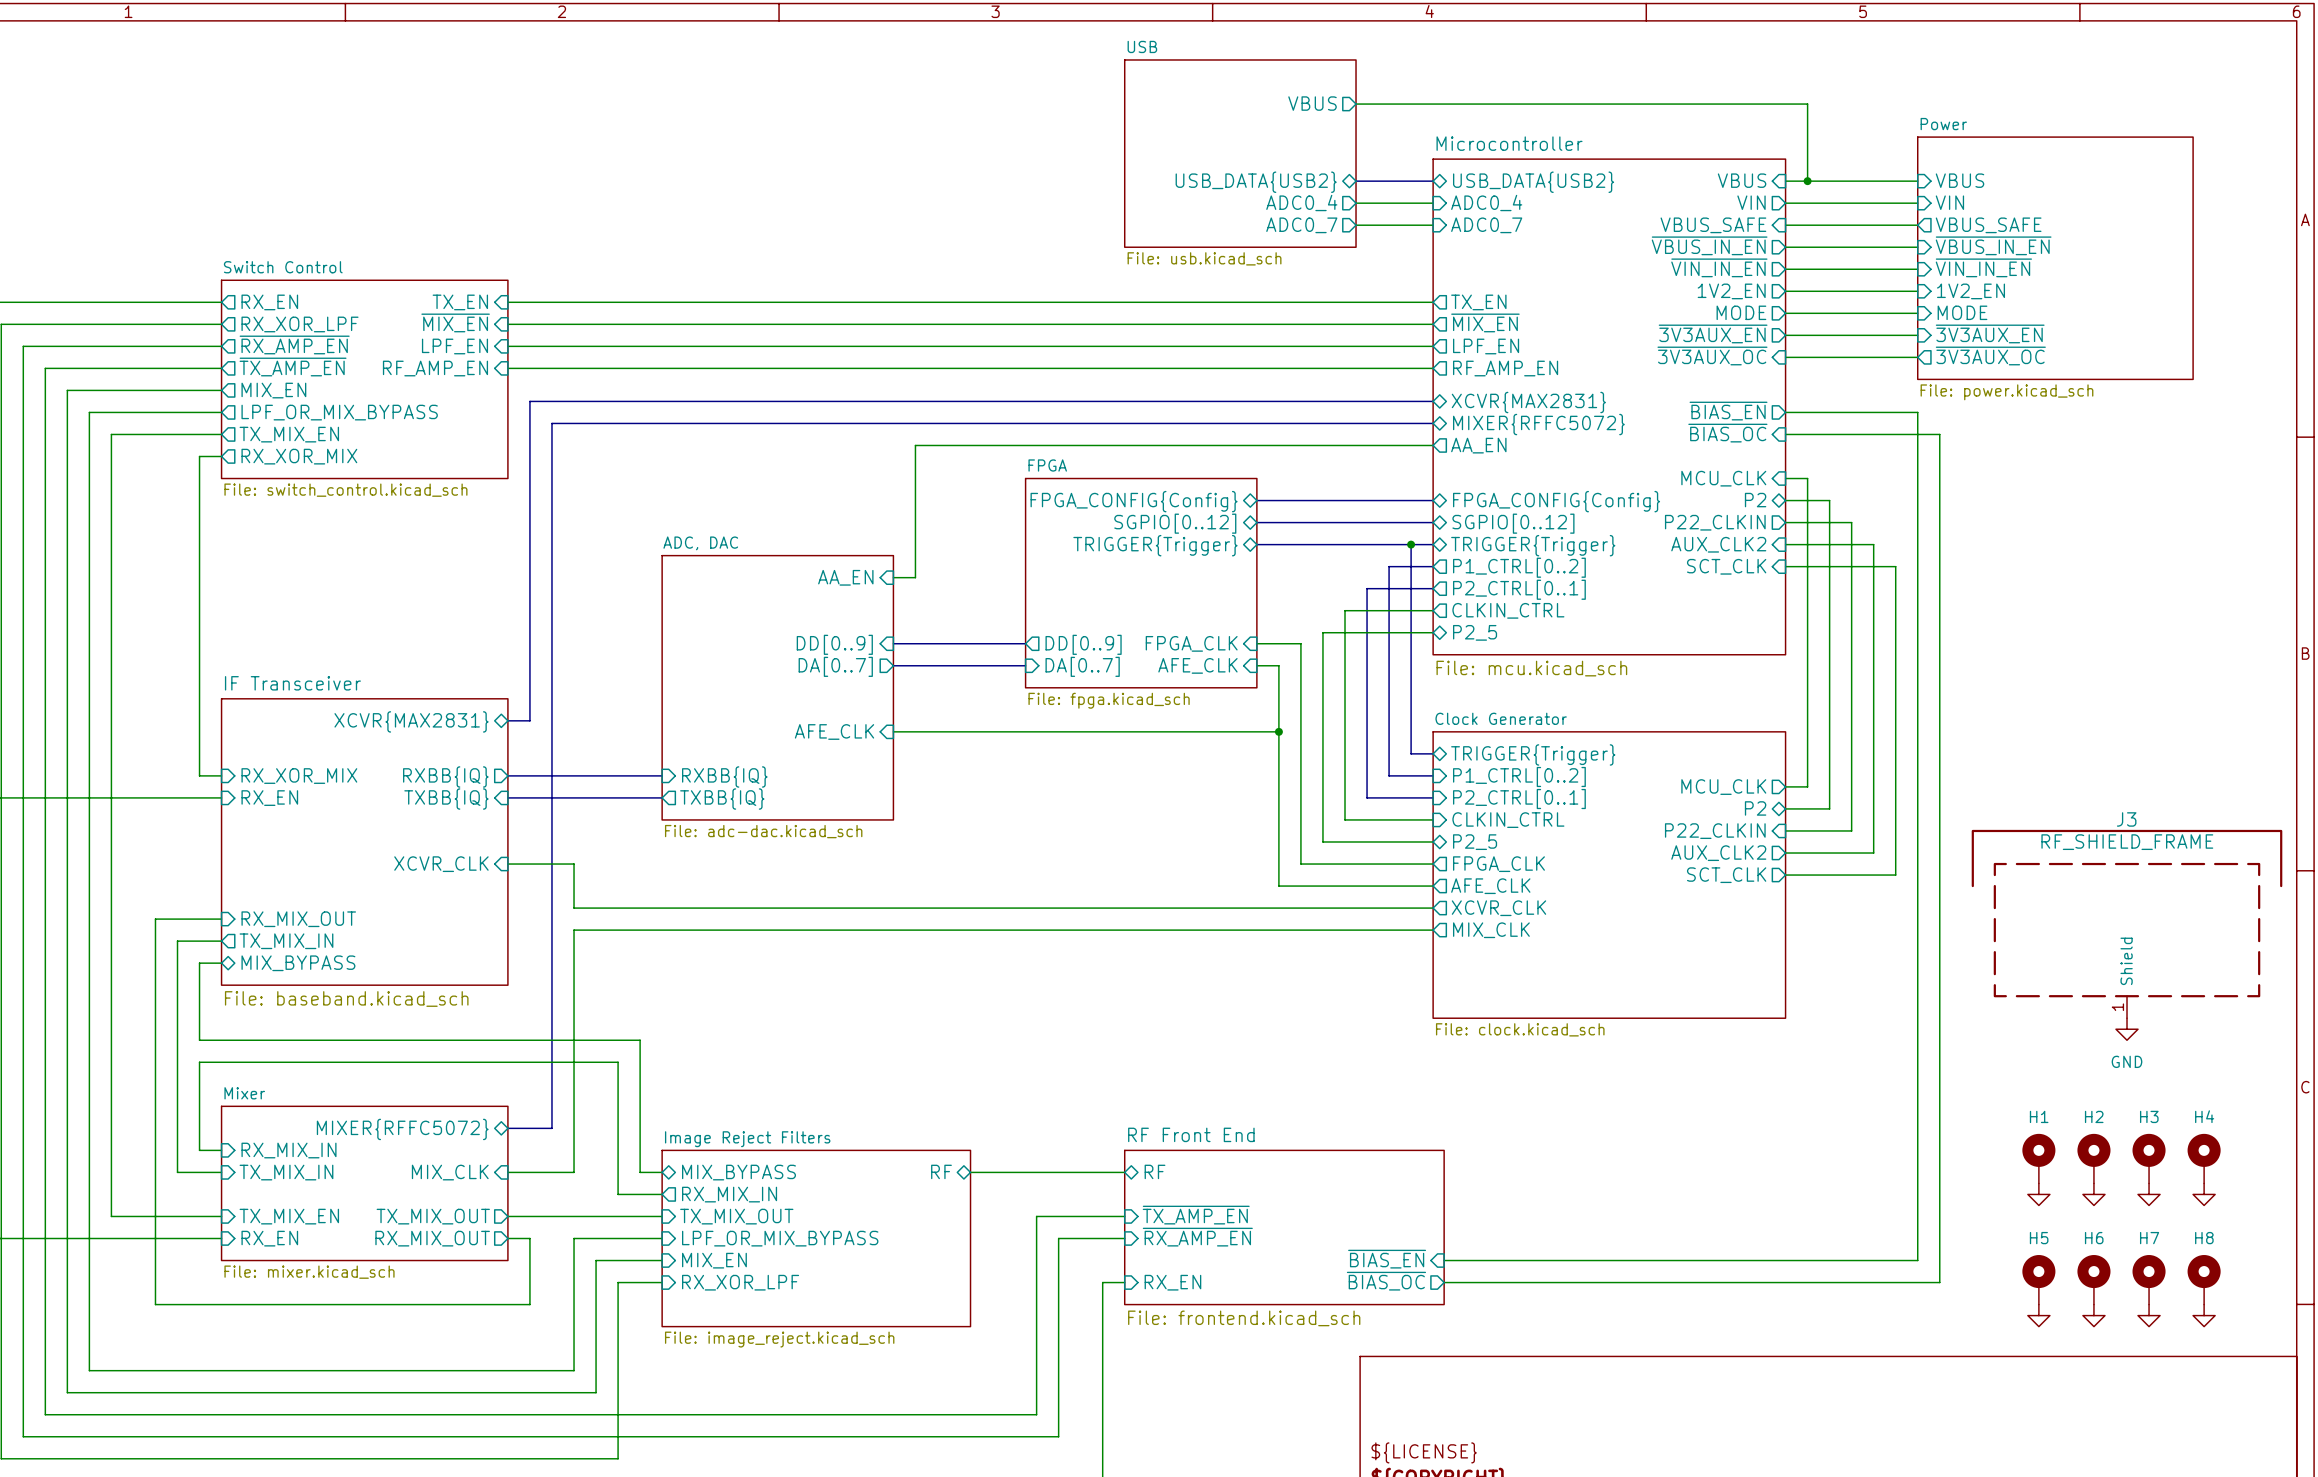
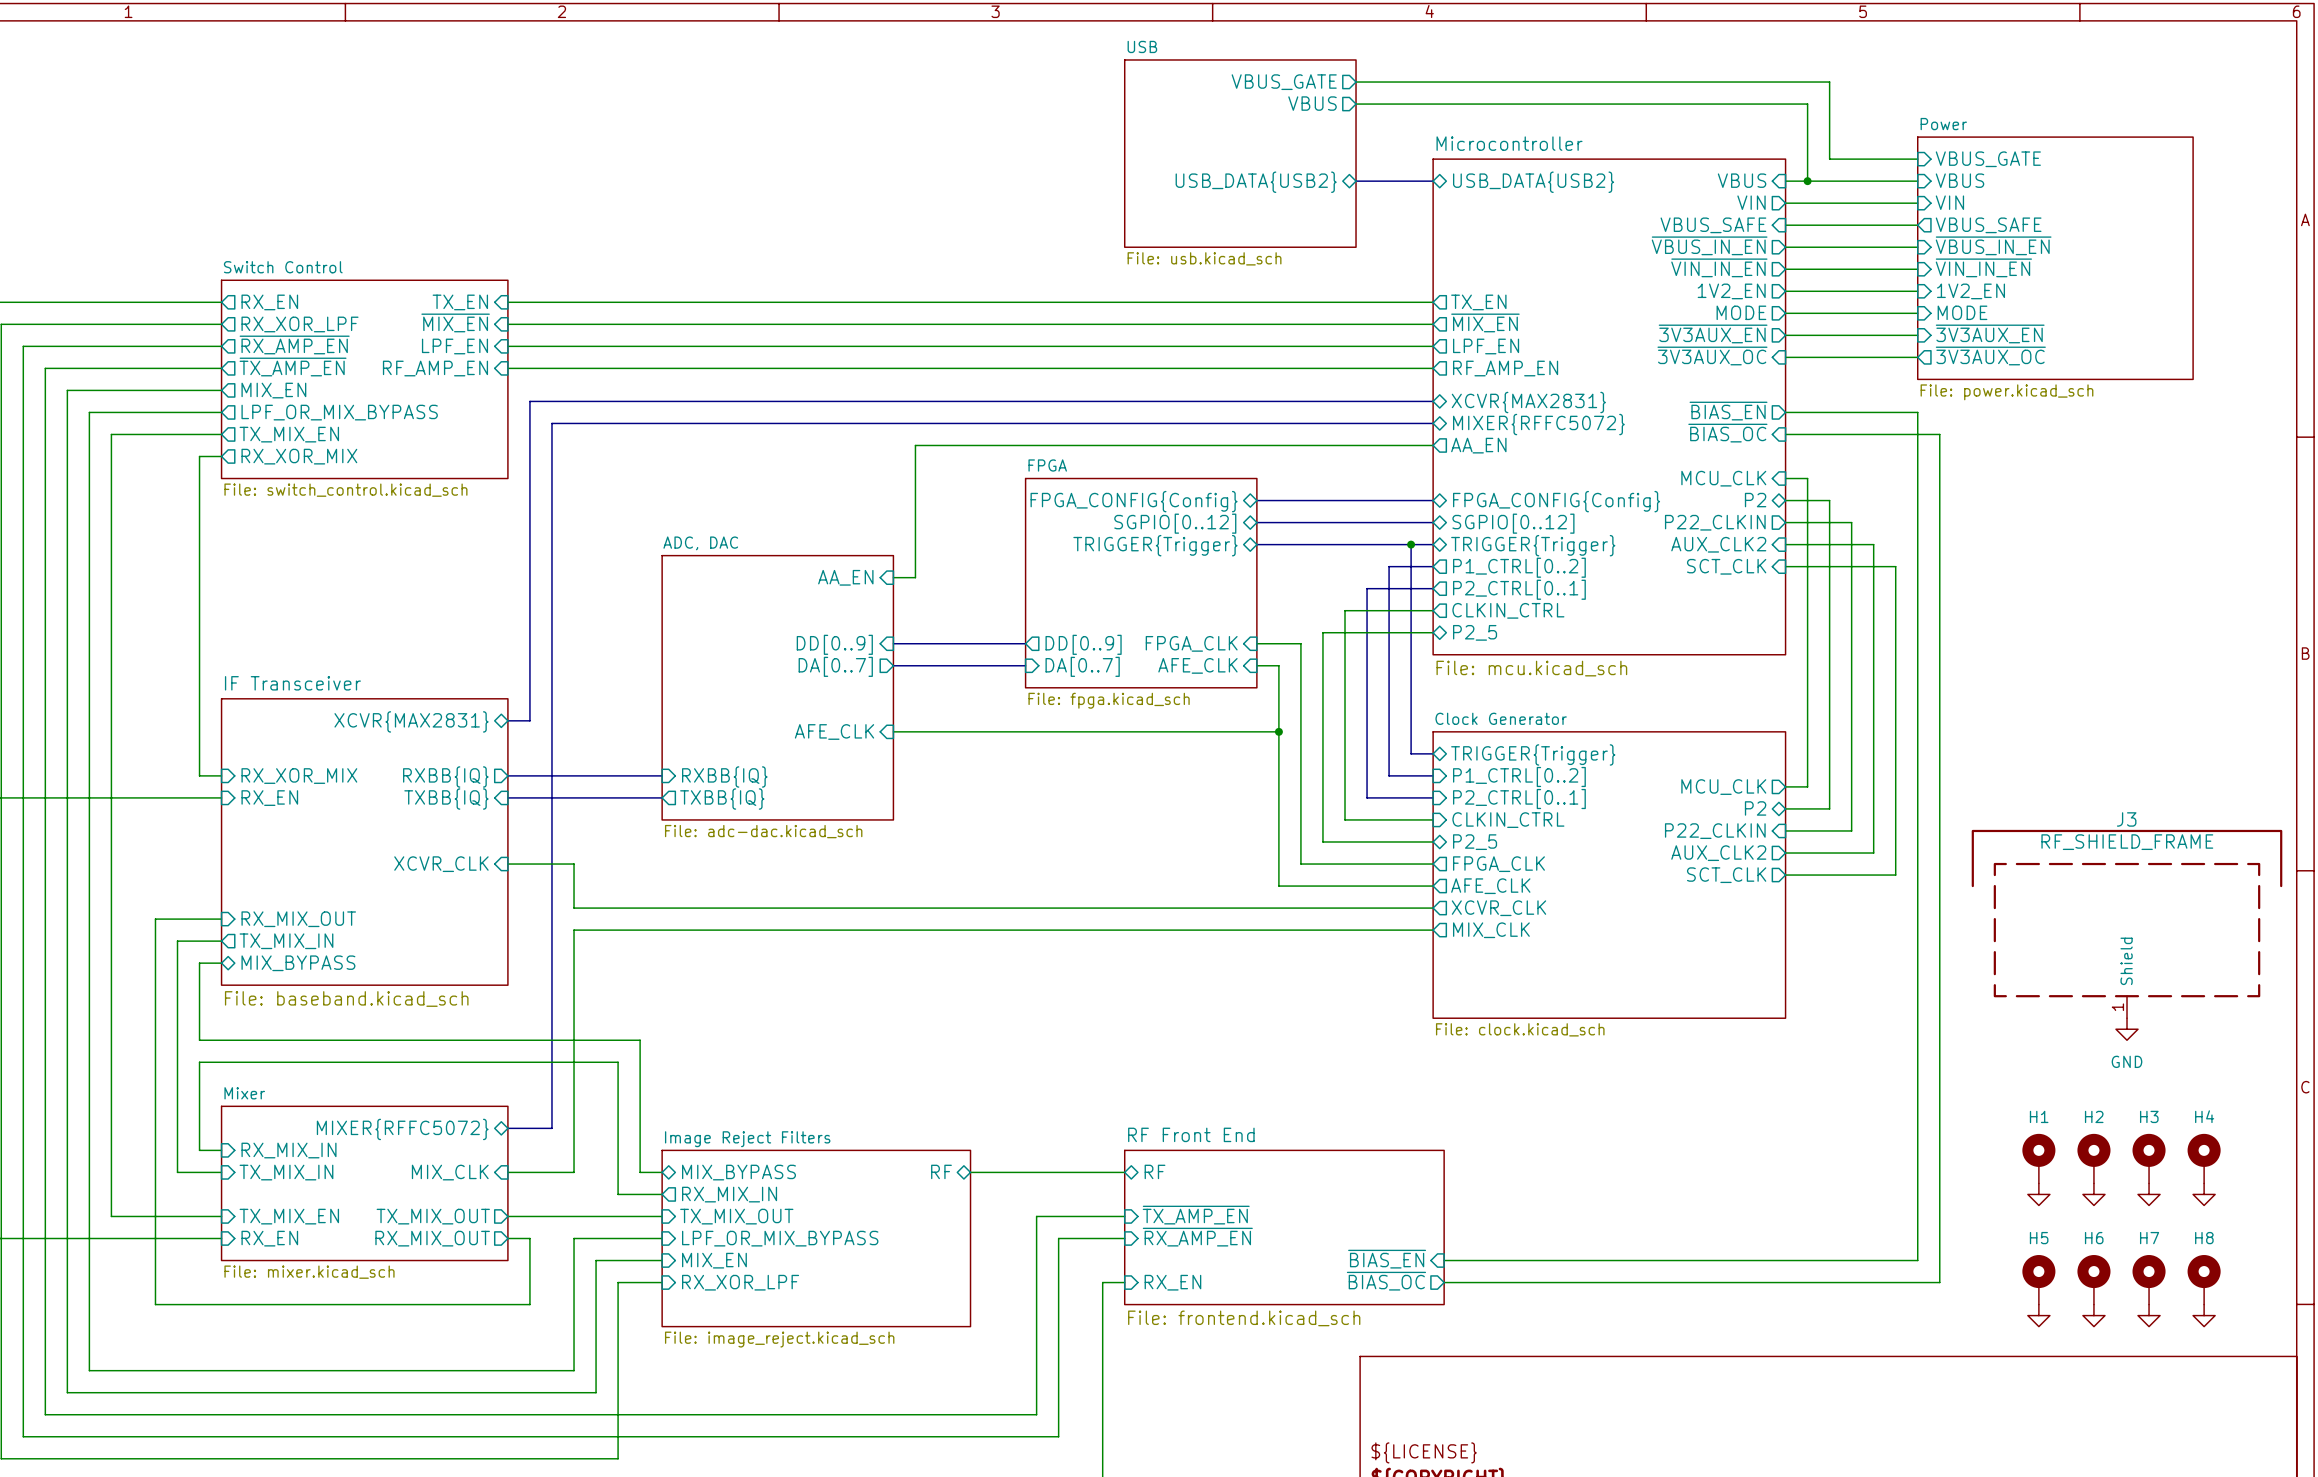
sheet pin: none -> VBUS_GATE (1284, 82)
wire: none -> (1356, 82) (1829, 82) (1829, 159) (1917, 159)
sheet pin: none -> VBUS_GATE (1988, 159)
sheet pin: ADC0_4 (1301, 202) -> none
sheet pin: ADC0_4 (1486, 202) -> none
wire: (1356, 203) (1433, 203) -> none
sheet pin: ADC0_7 (1301, 225) -> none
wire: (1356, 225) (1433, 225) -> none
sheet pin: ADC0_7 (1486, 225) -> none

